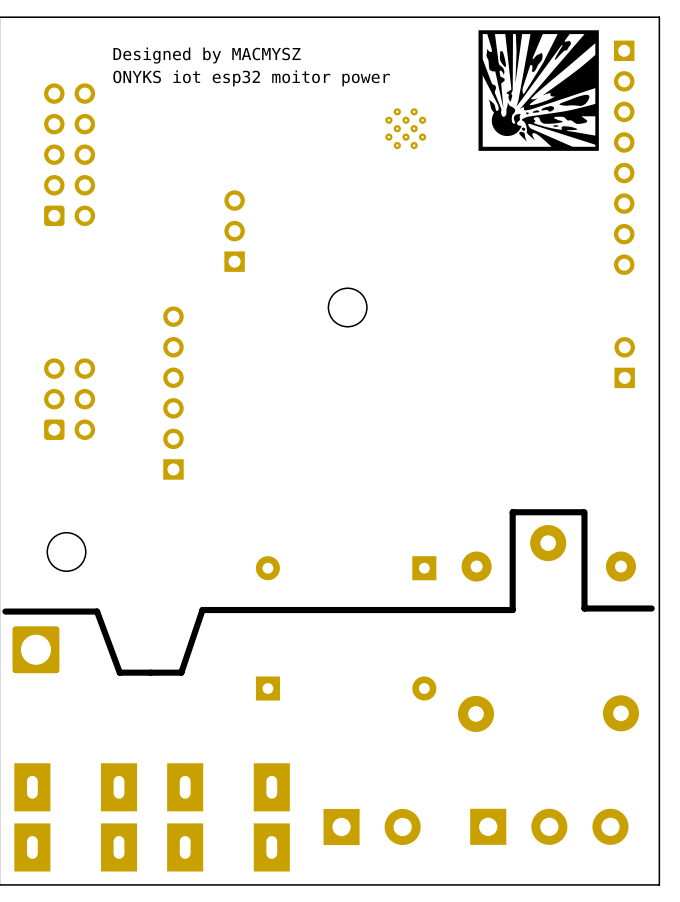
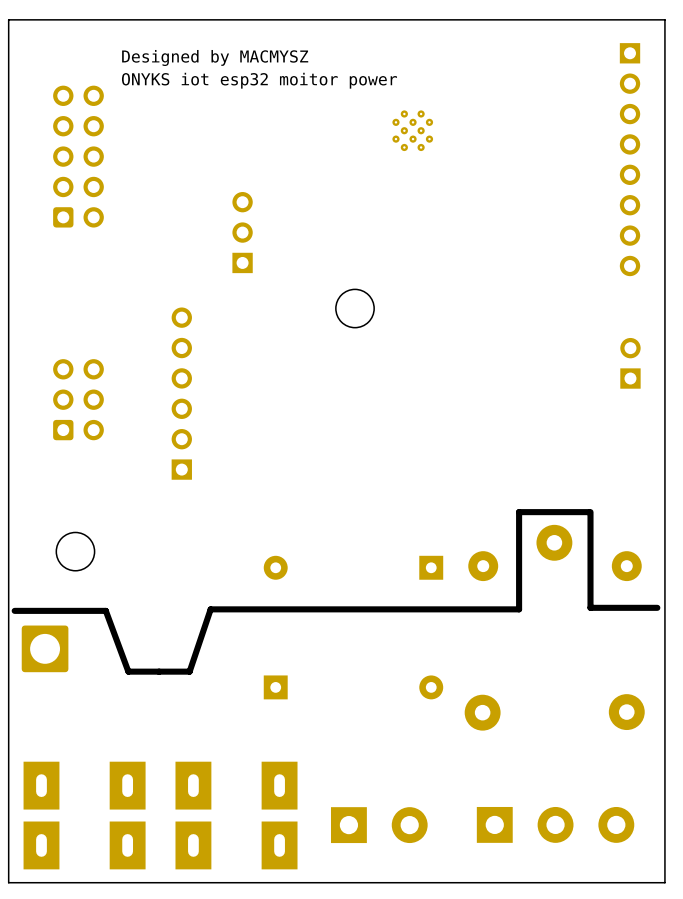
drawing: [478, 30, 599, 151] -> none

